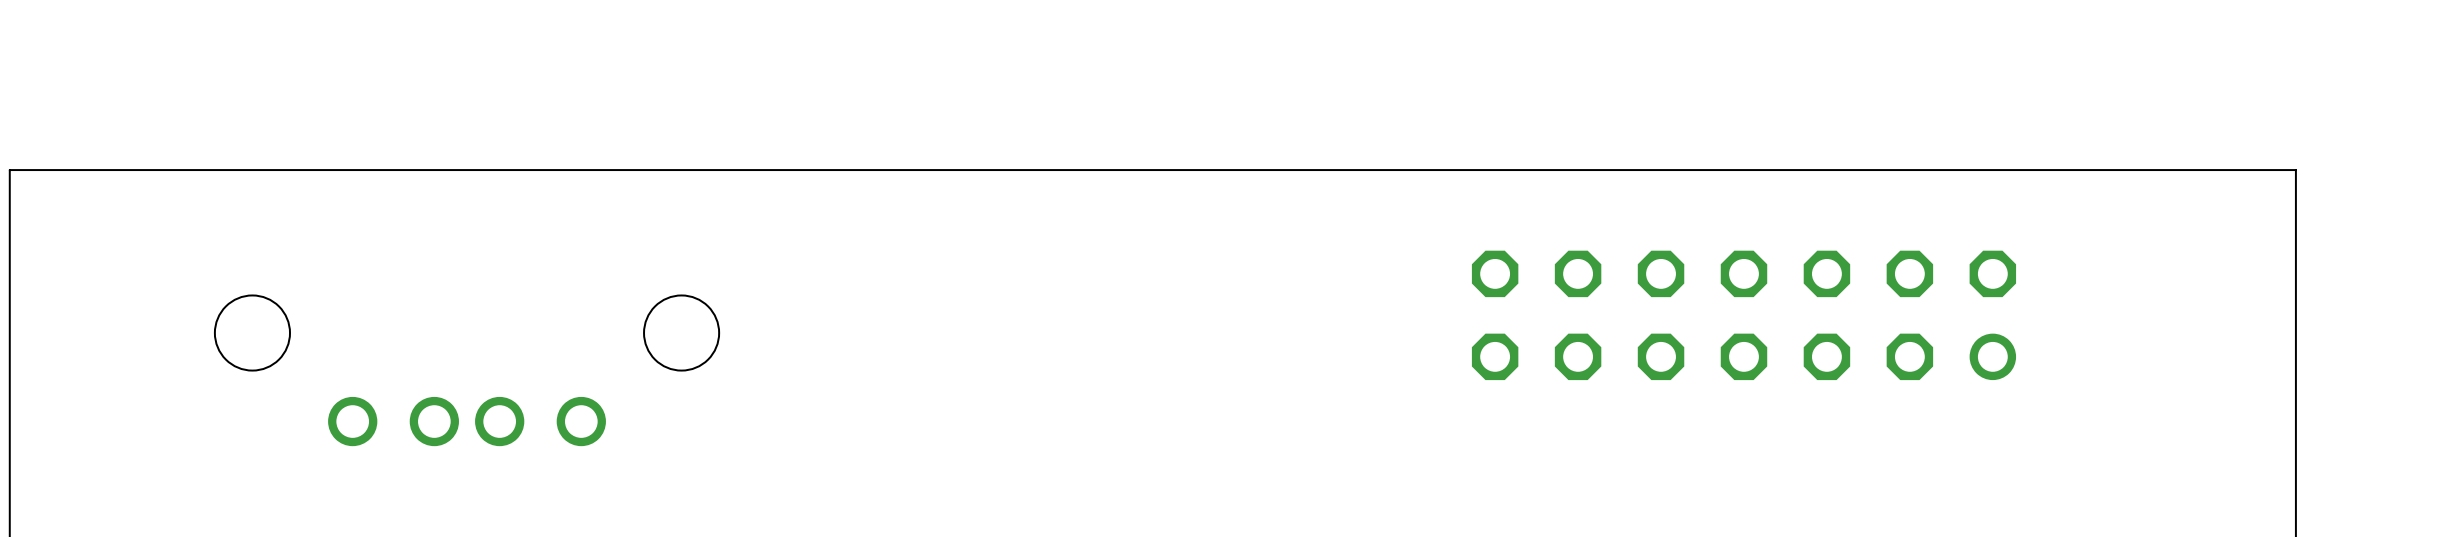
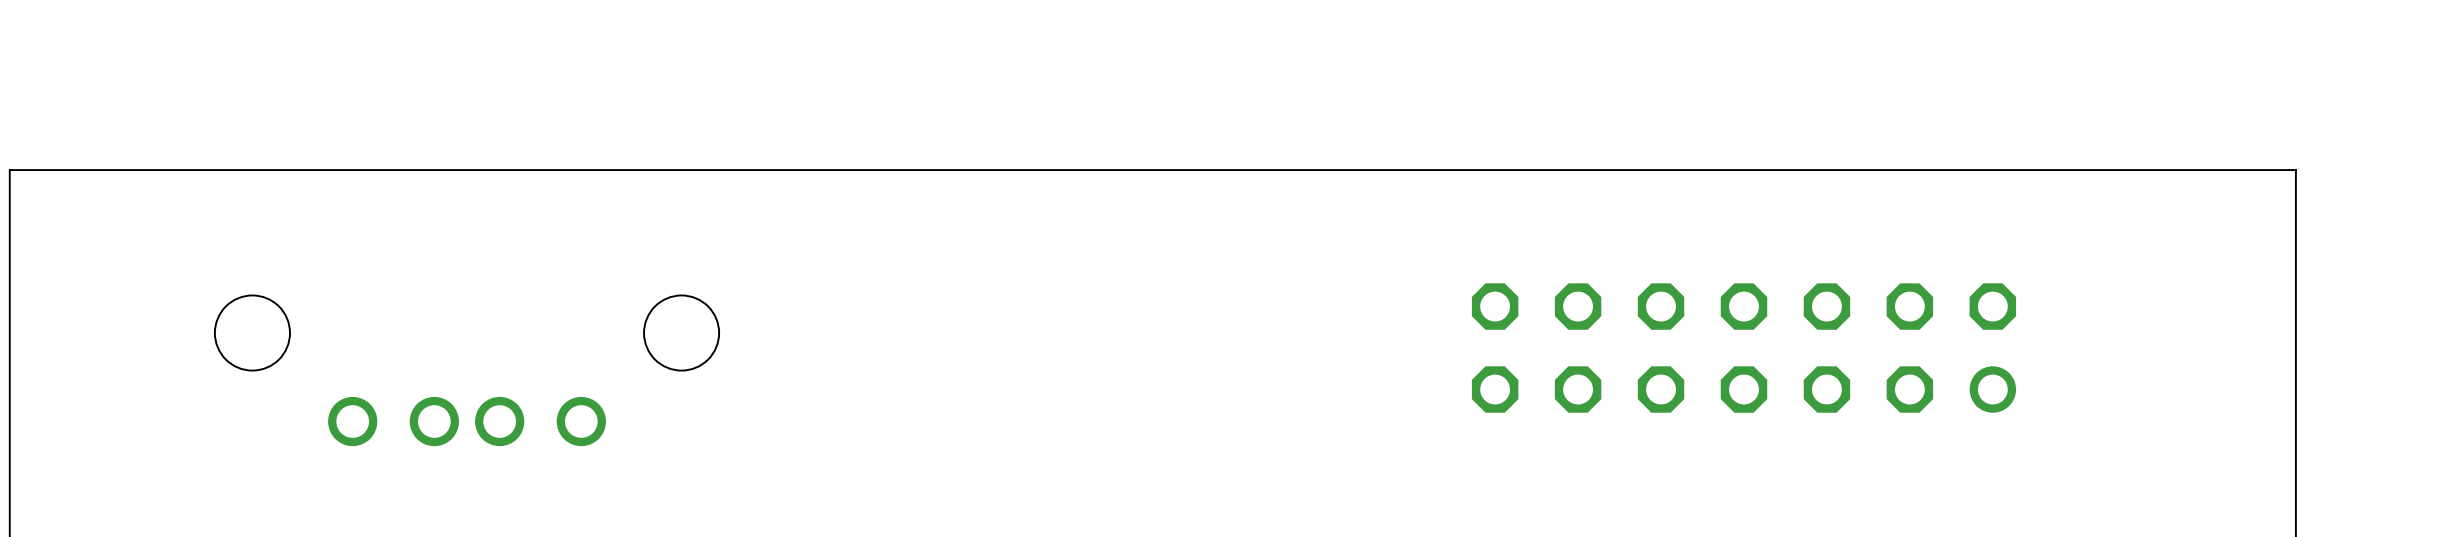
part position: (1743, 315) -> (1743, 348)

